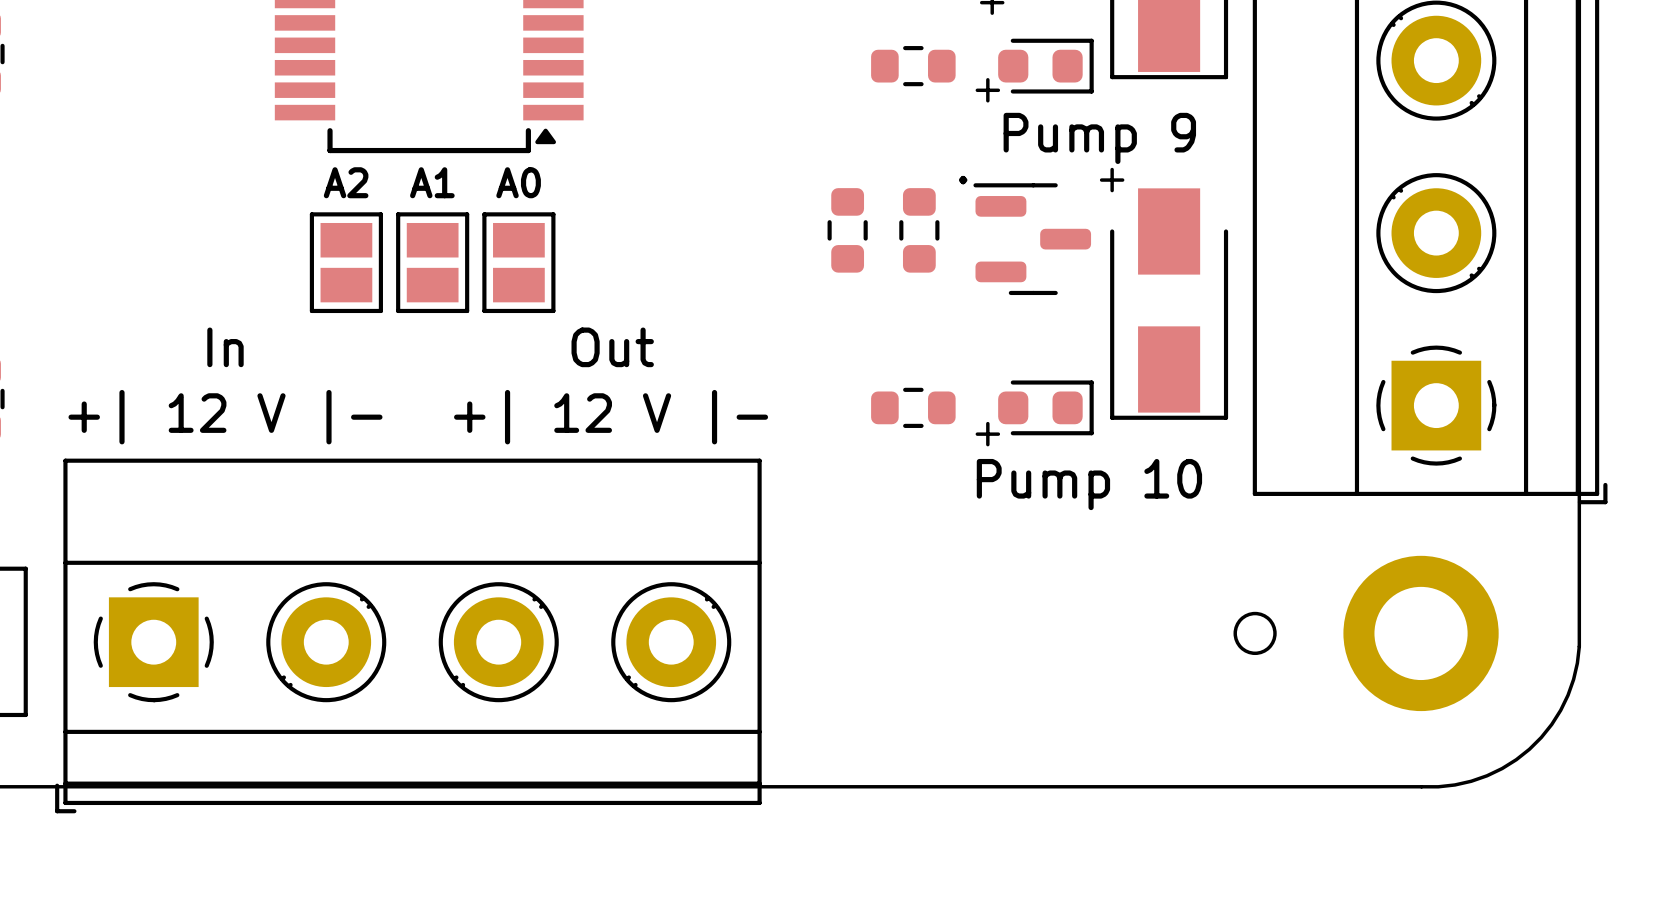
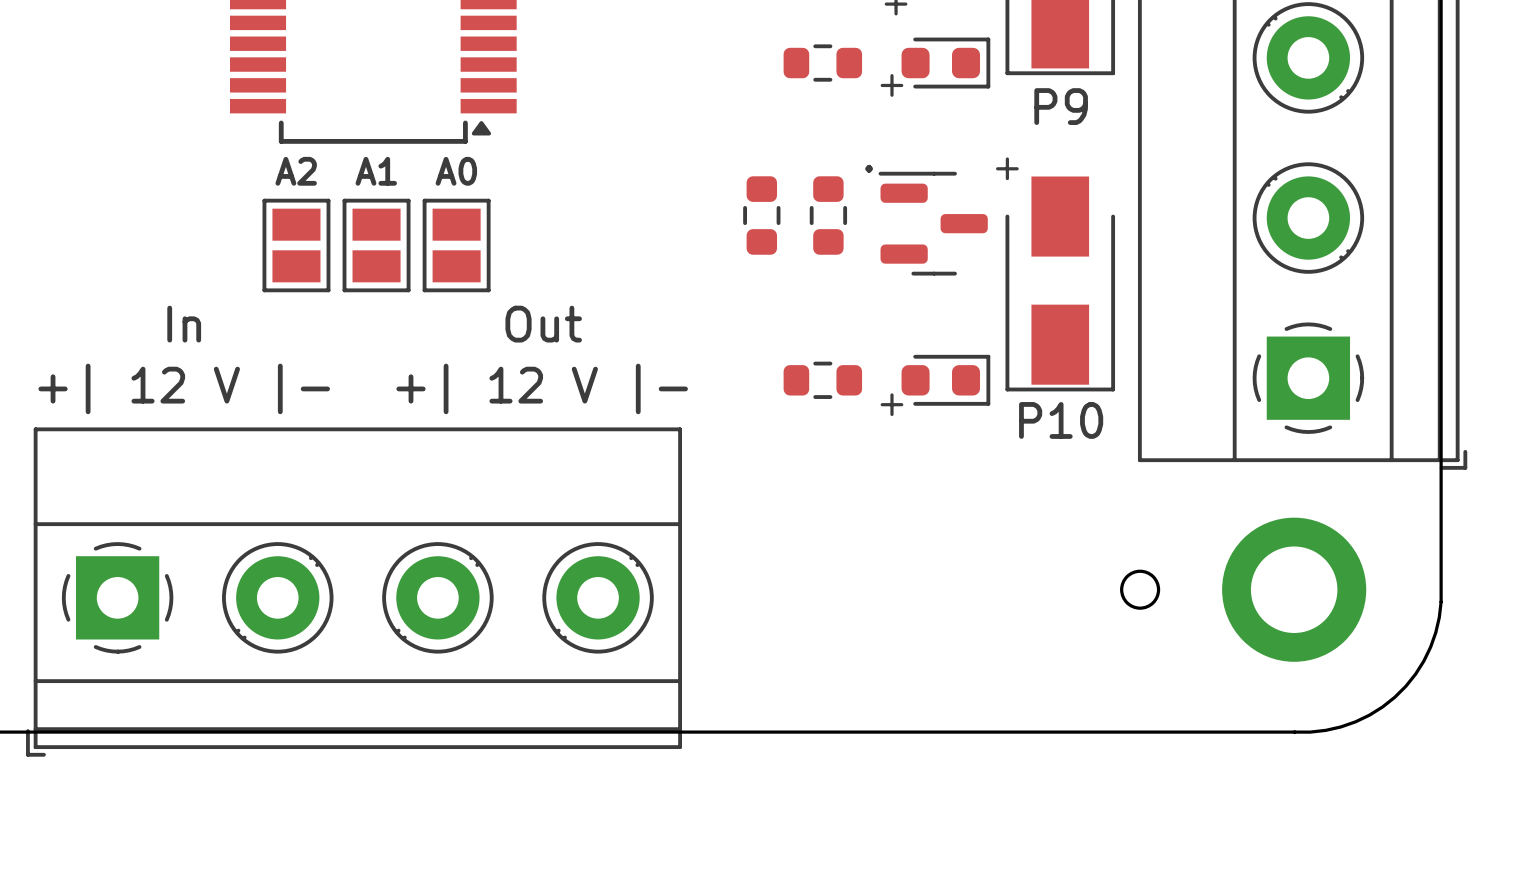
text: none -> P9 (1061, 106)
text: Pump 9 (1099, 138) -> none
text: none -> P10 (1061, 420)
text: Pump 10 (1089, 484) -> none

